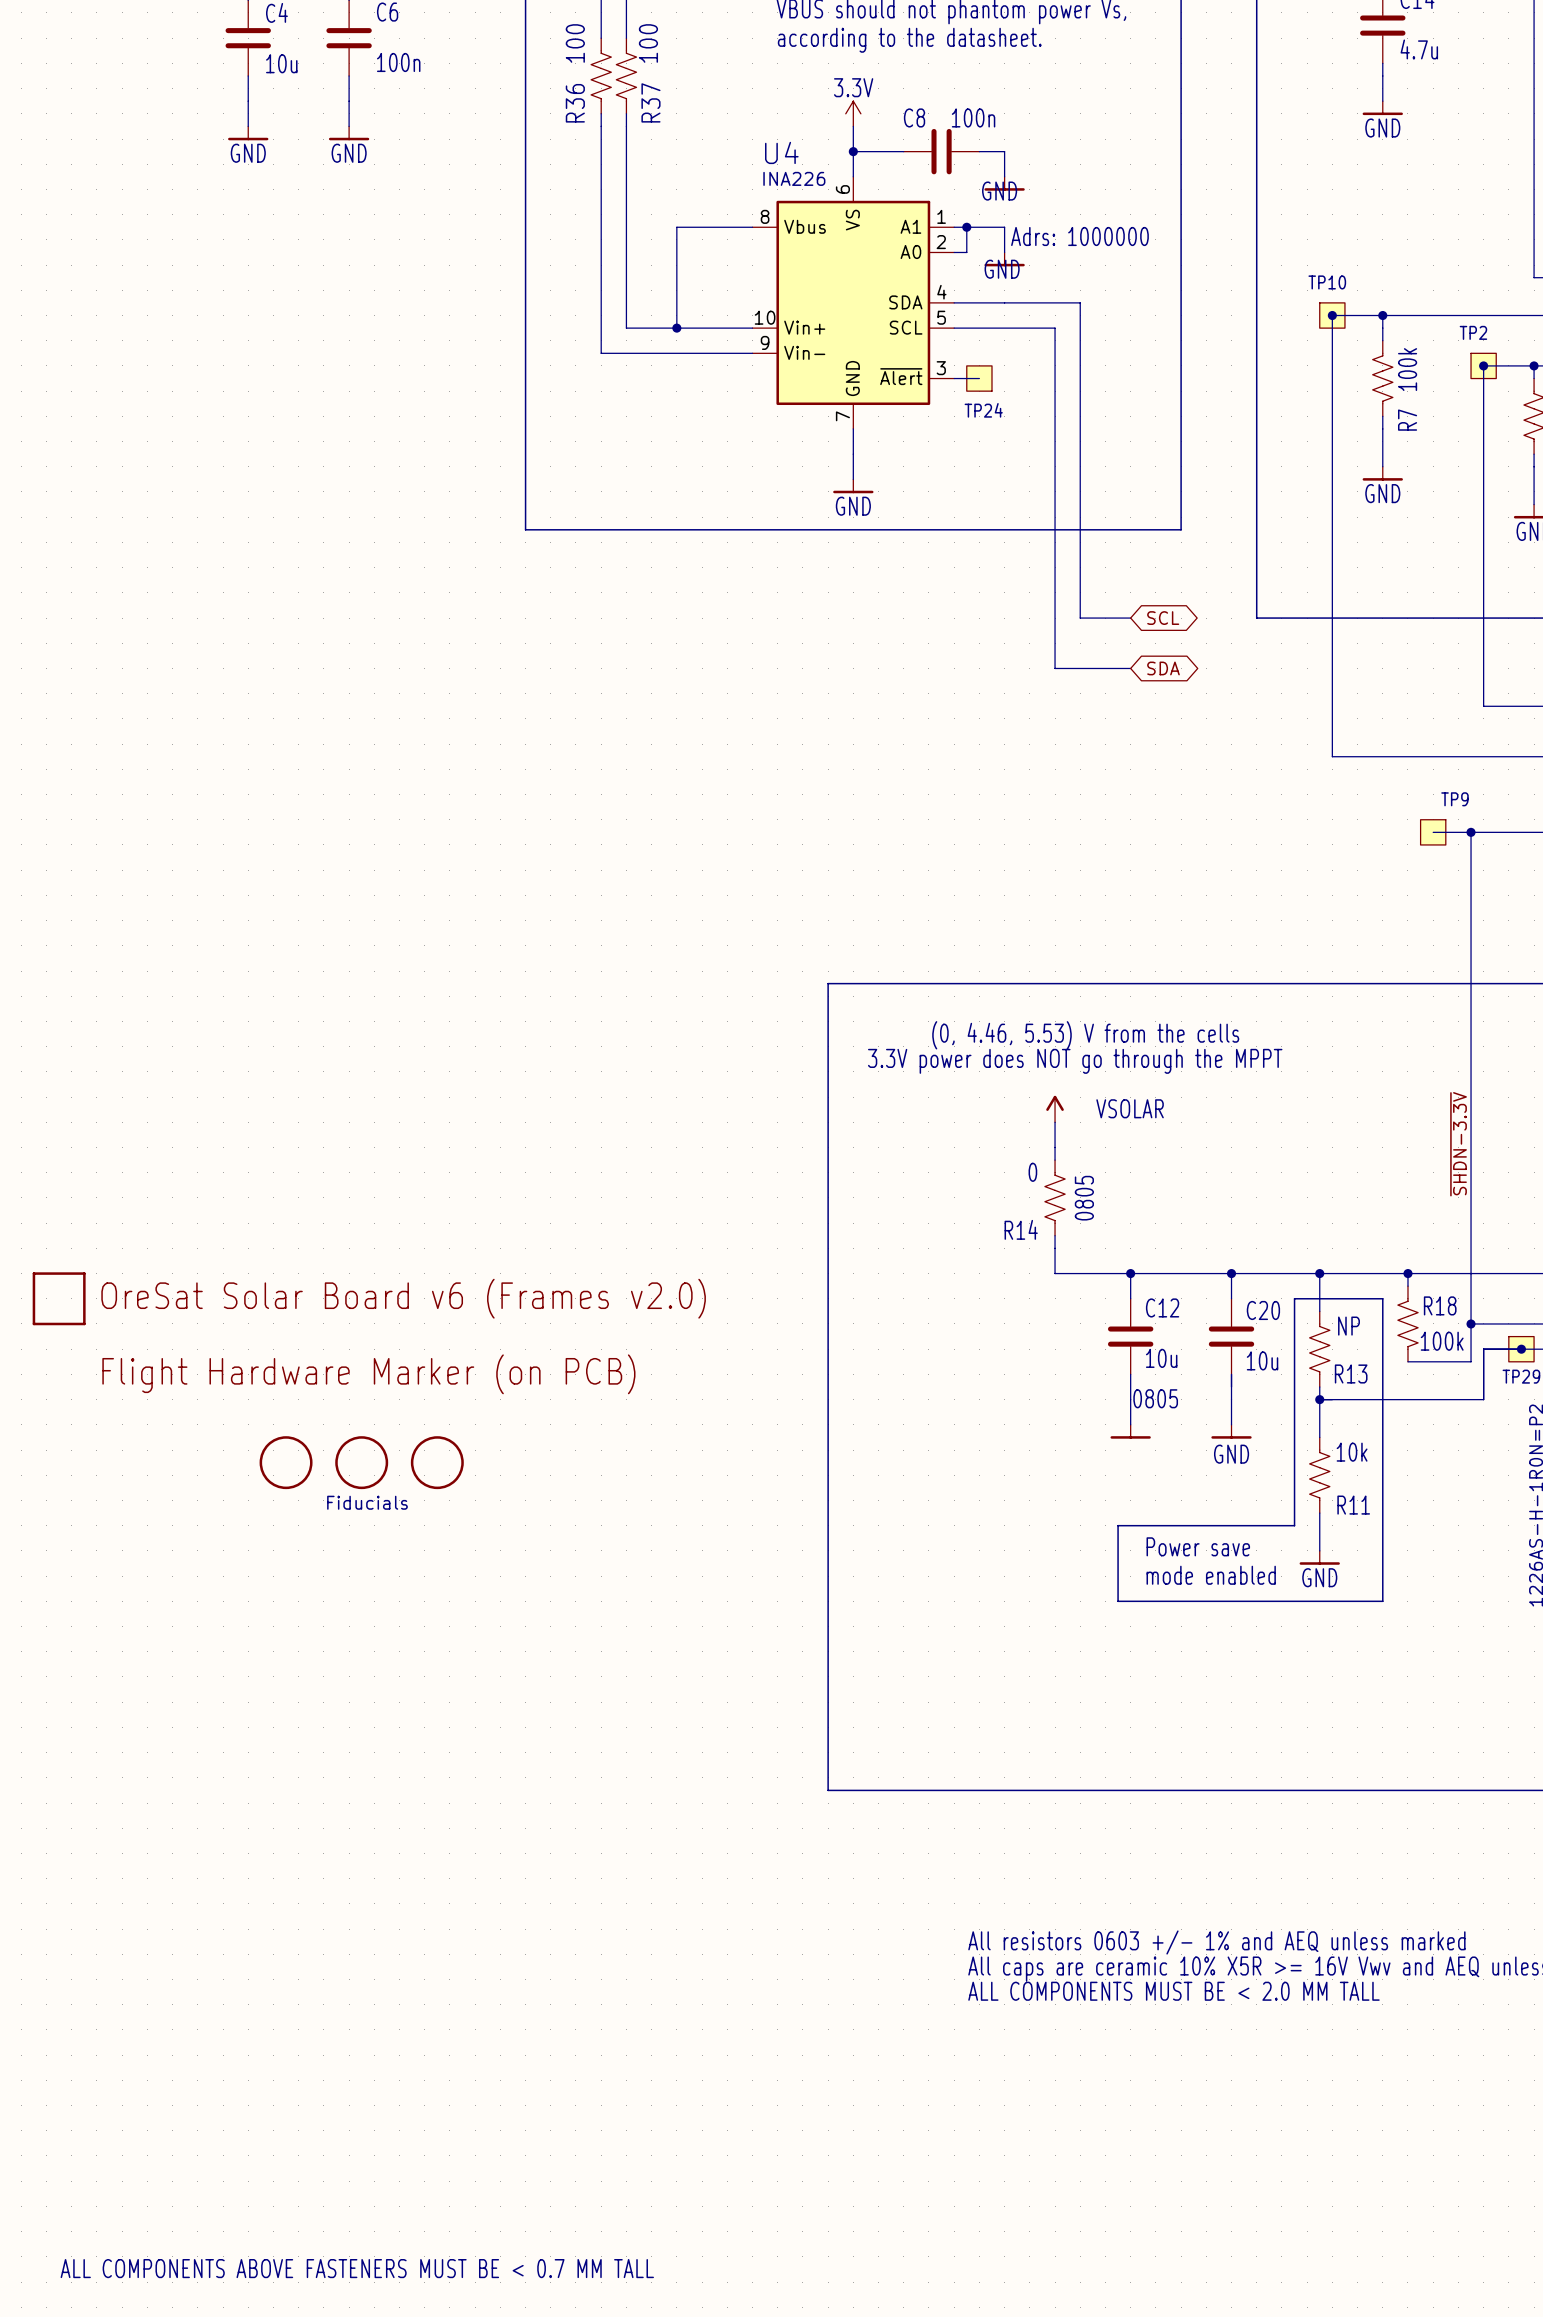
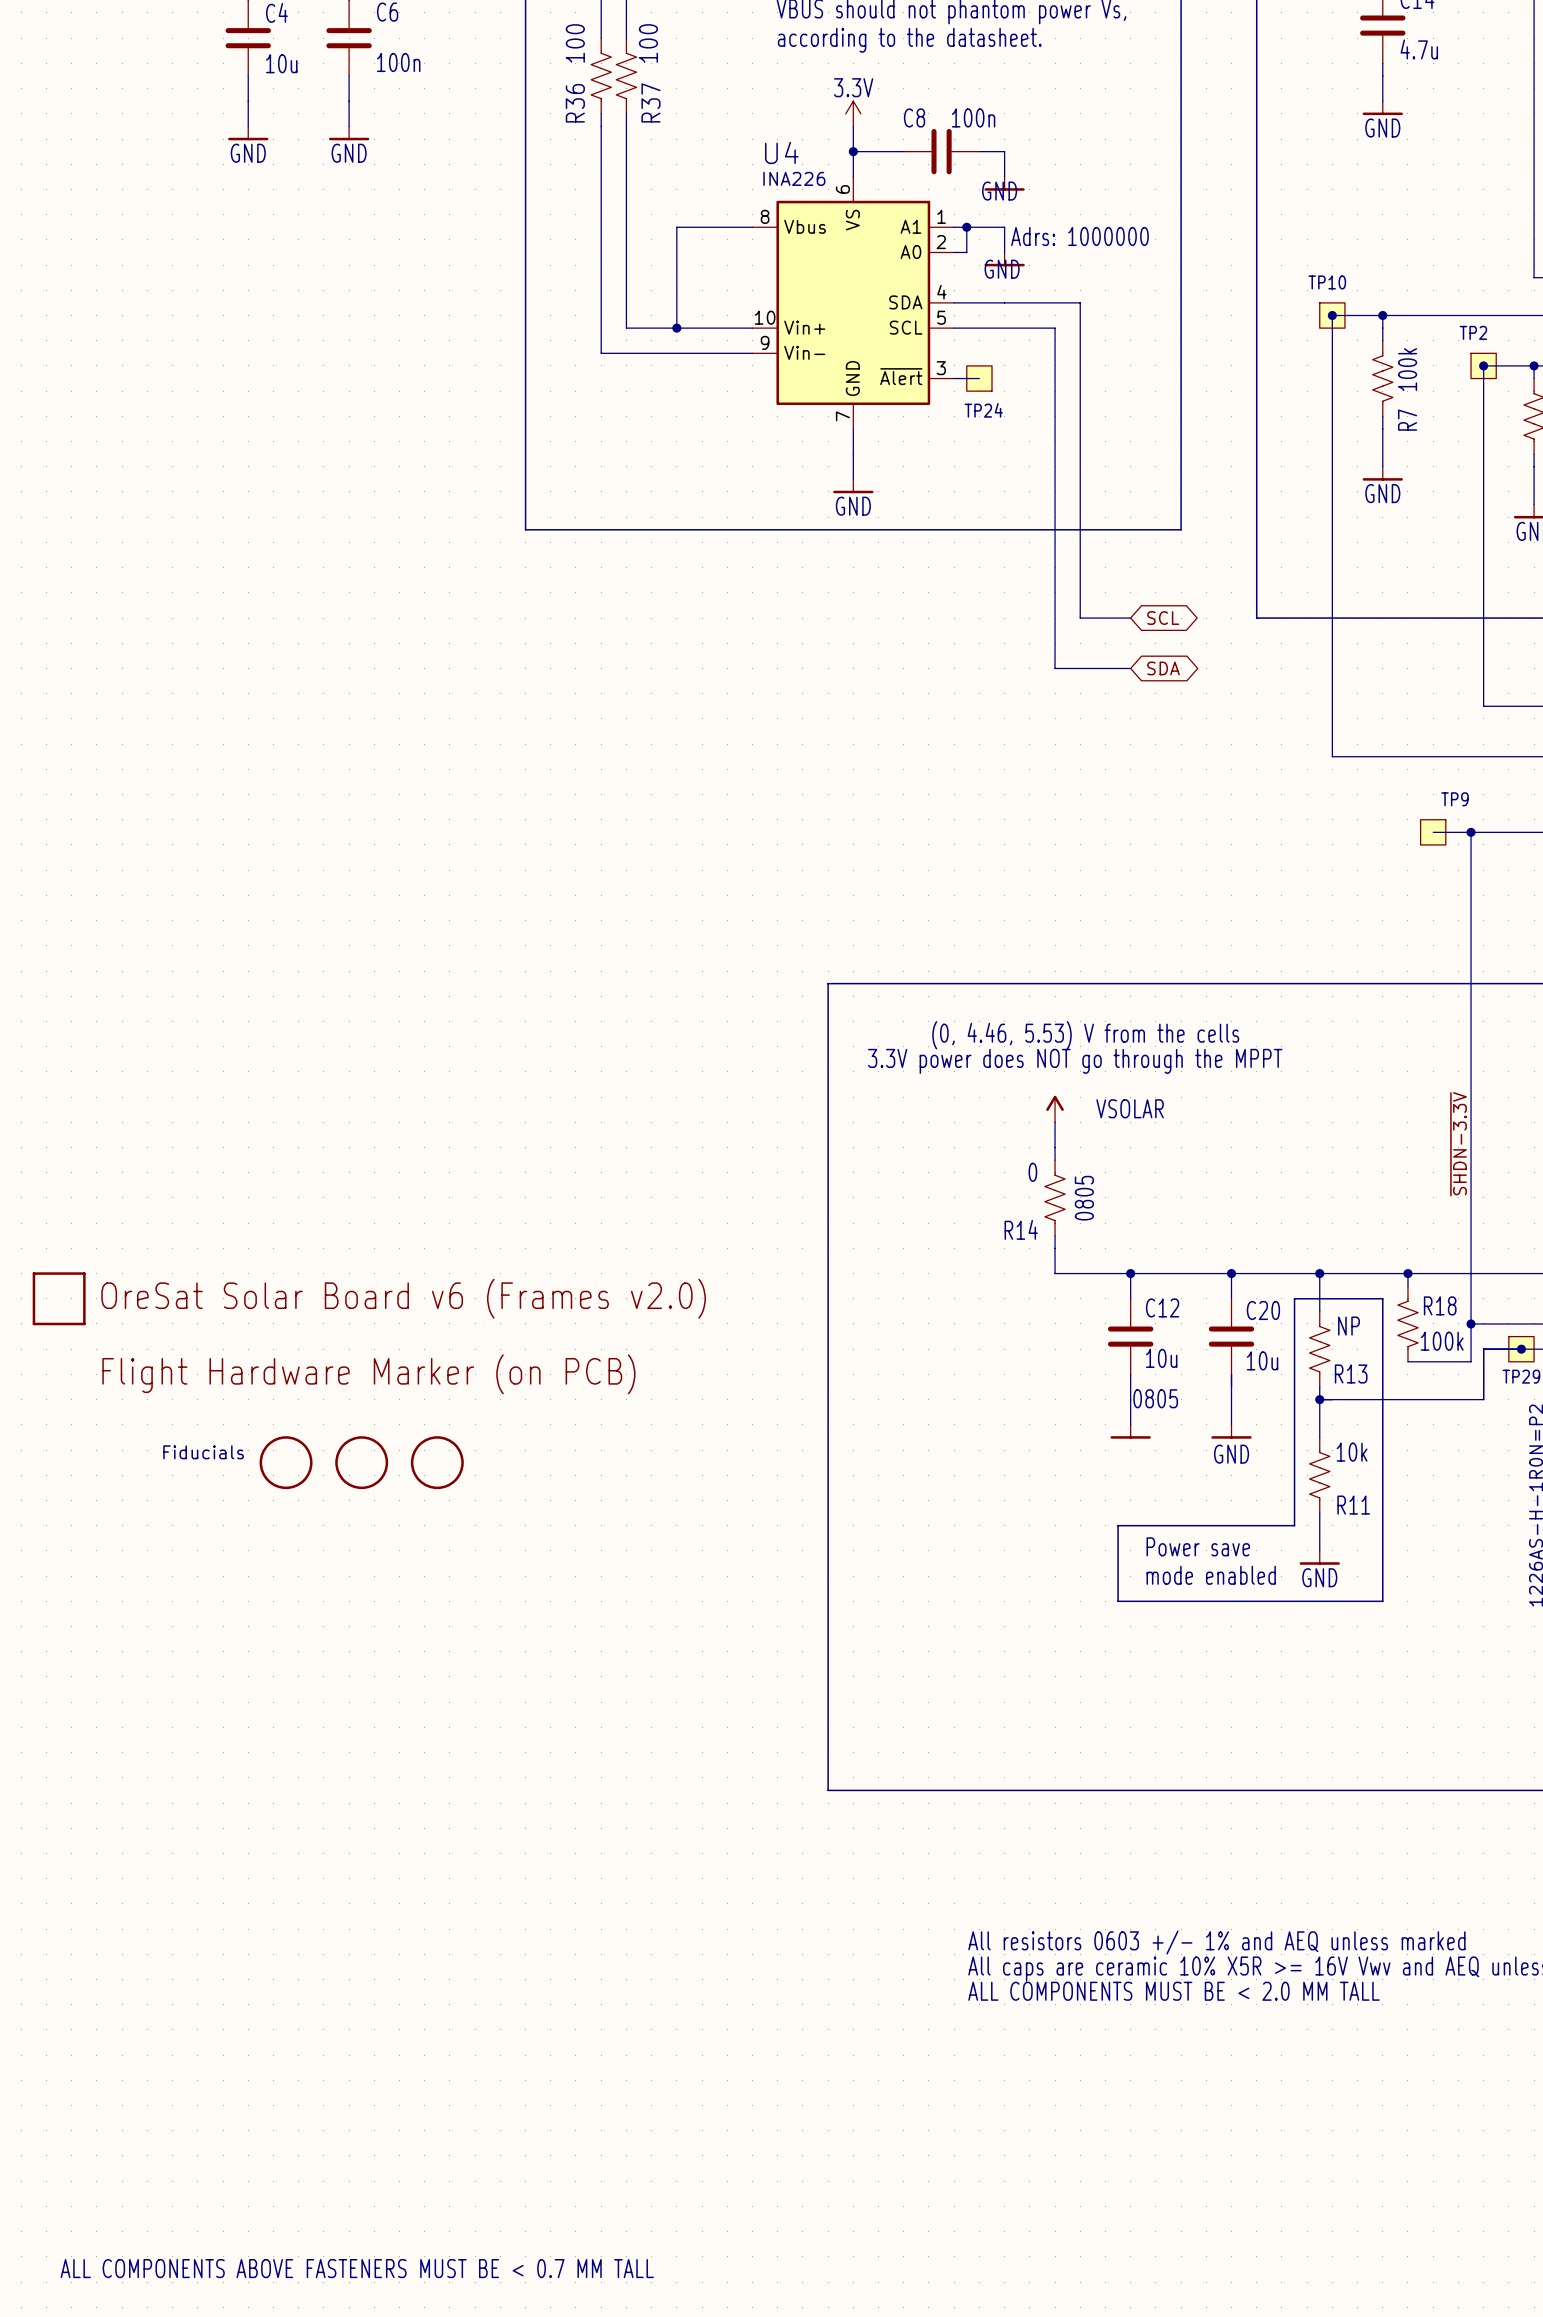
text position: Fiducials (367, 1502) -> Fiducials (203, 1452)

